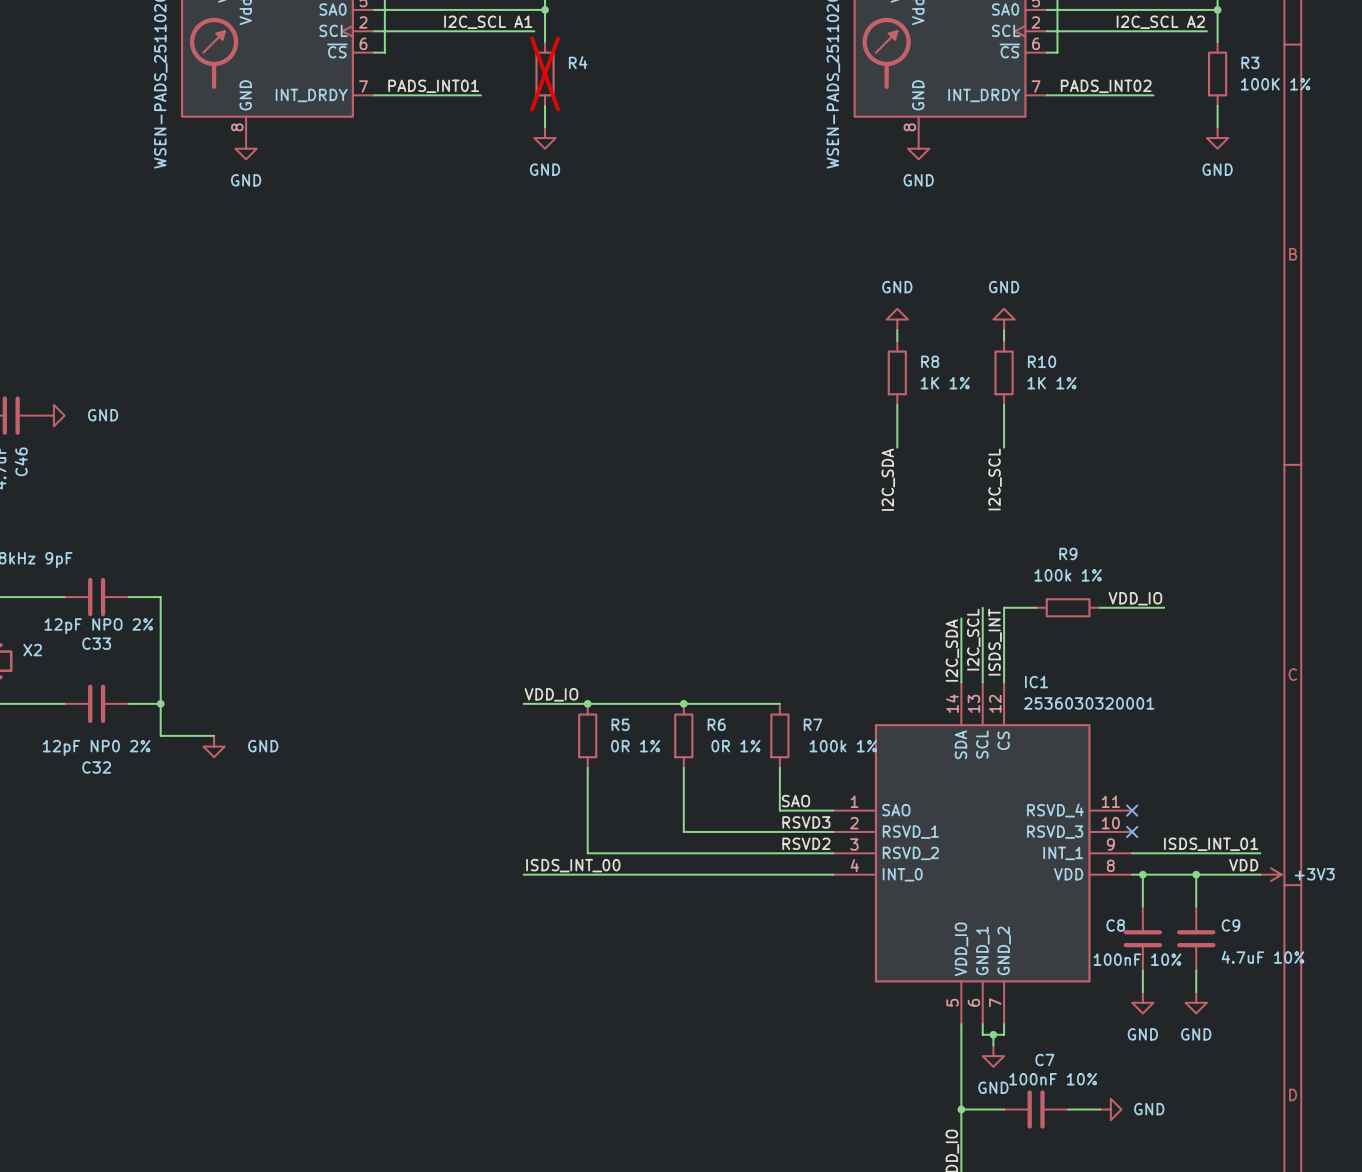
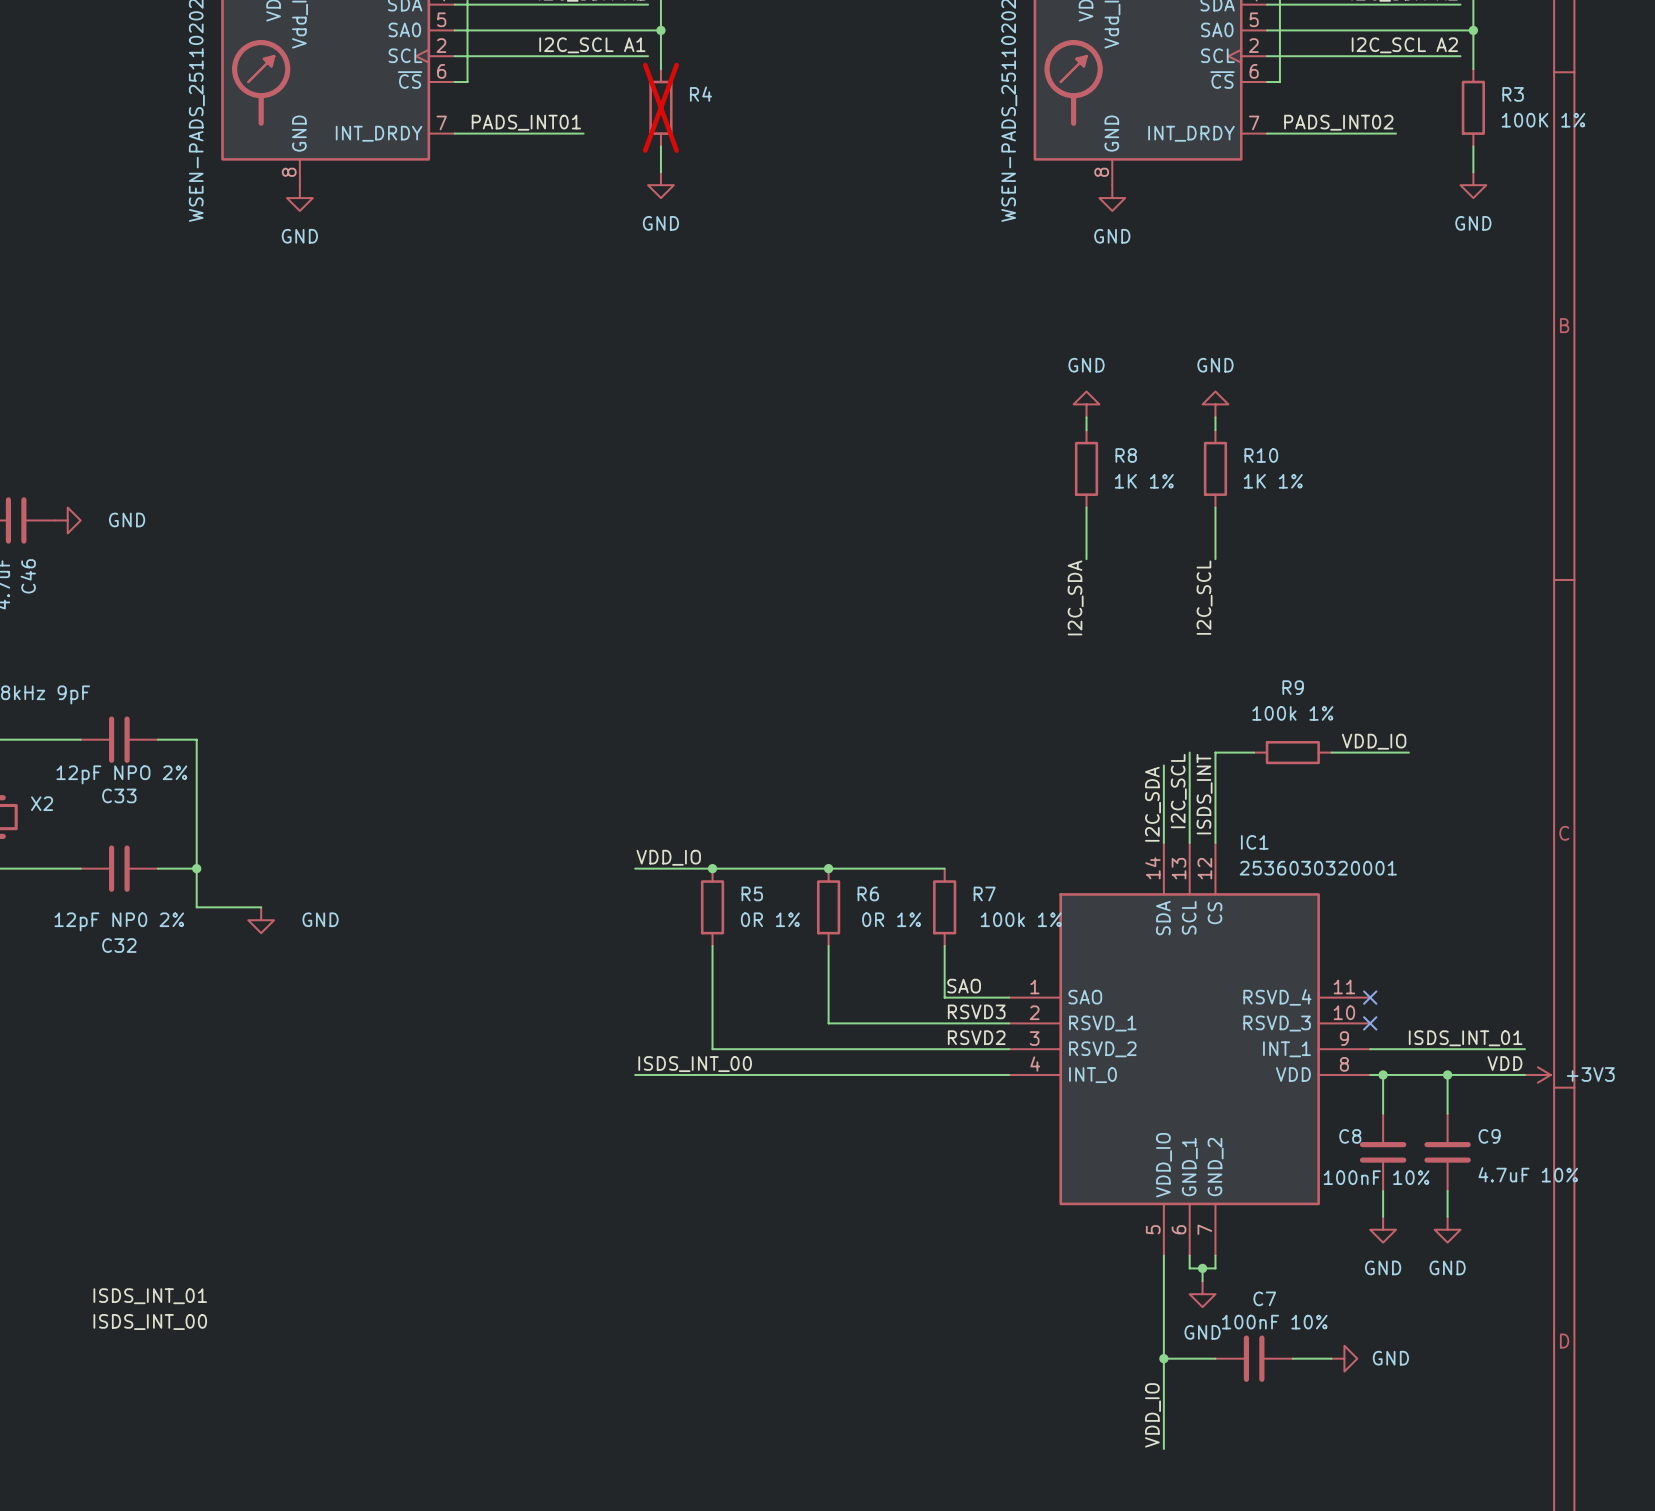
label: none -> ISDS_INT_01 (150, 1296)
label: none -> ISDS_INT_00 (150, 1322)

